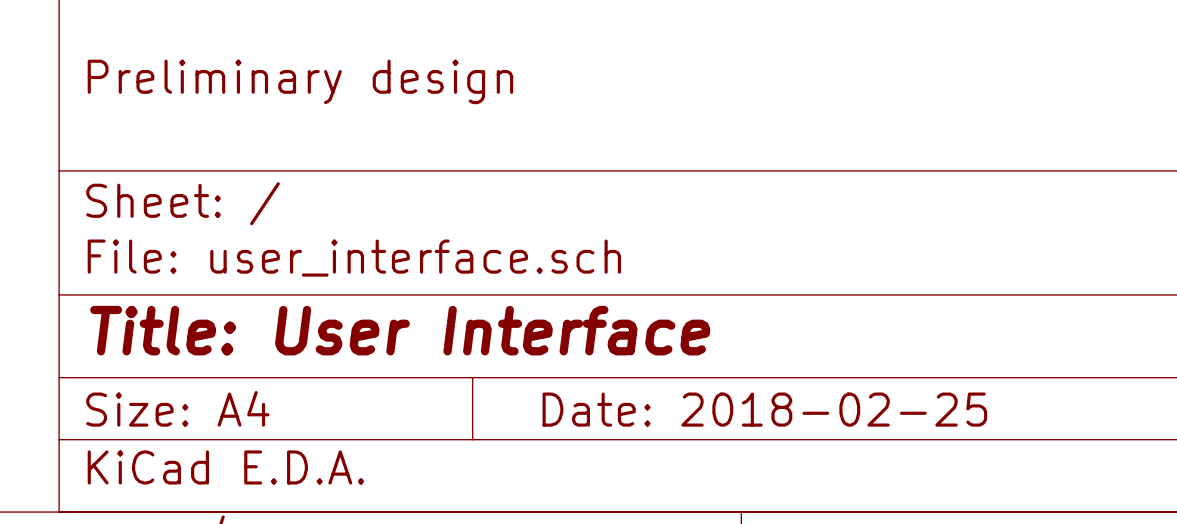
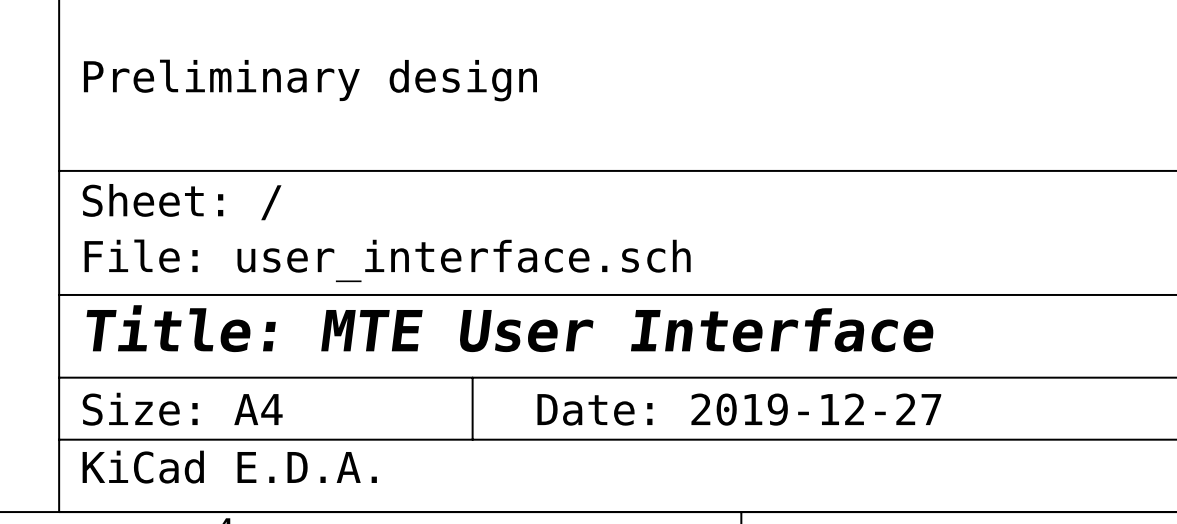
title block: Title: User Interface (400, 330) -> Title: MTE User Interface (510, 328)
title block: Date: 2018-02-25 (764, 409) -> Date: 2019-12-27 (739, 409)

